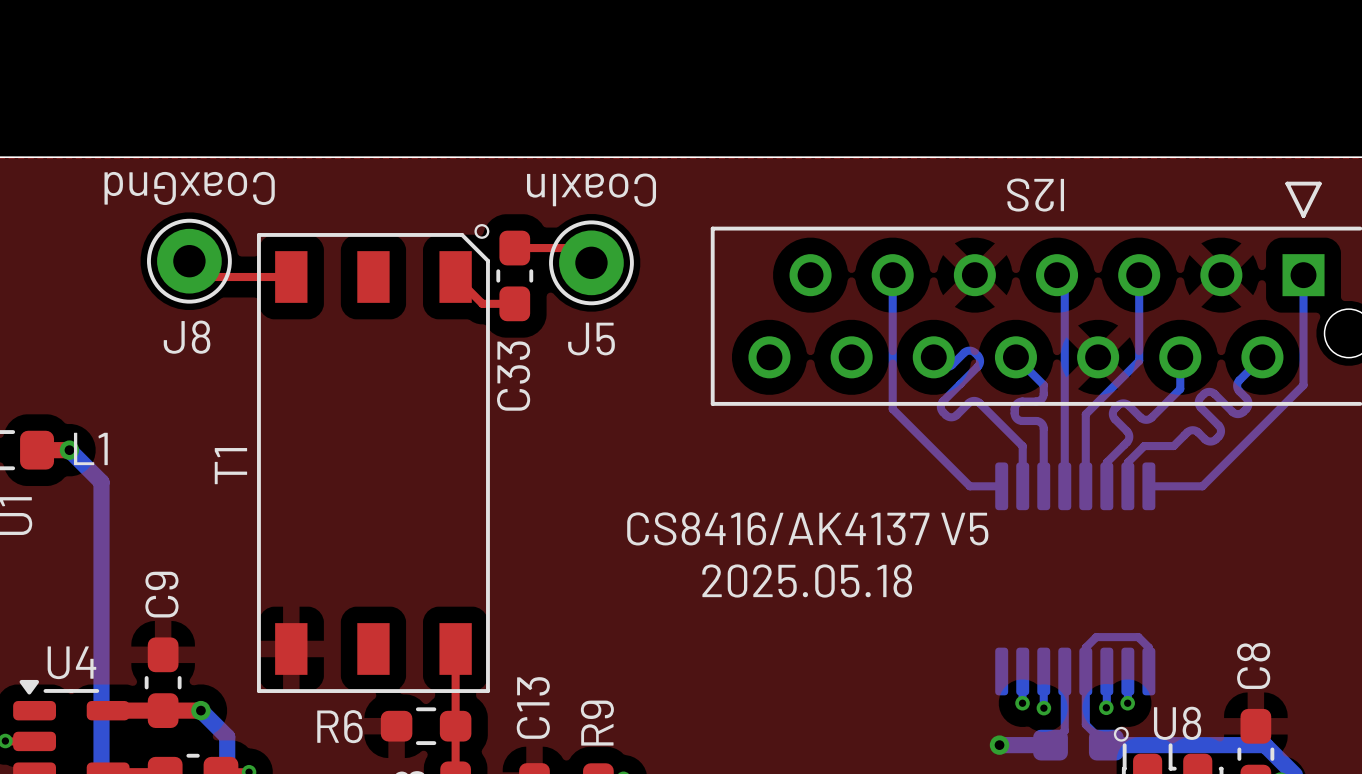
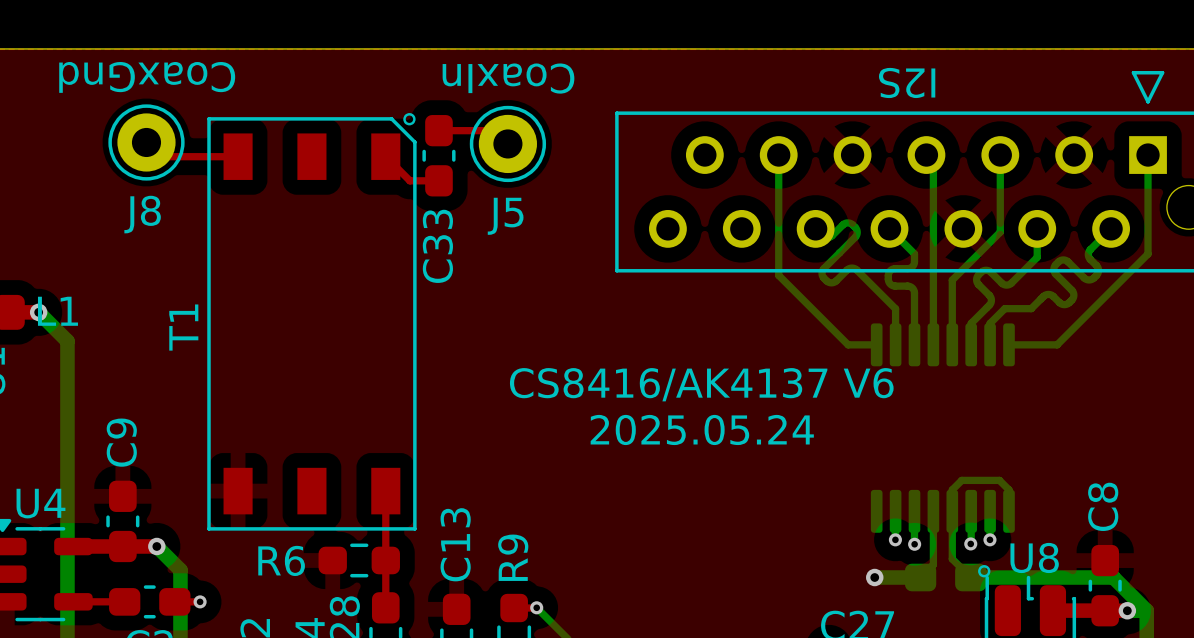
text: CS8416/AK4137 V5 (807, 528) -> CS8416/AK4137 V6 (701, 384)
text: 2025.05.18 (807, 580) -> 2025.05.24 (702, 429)

